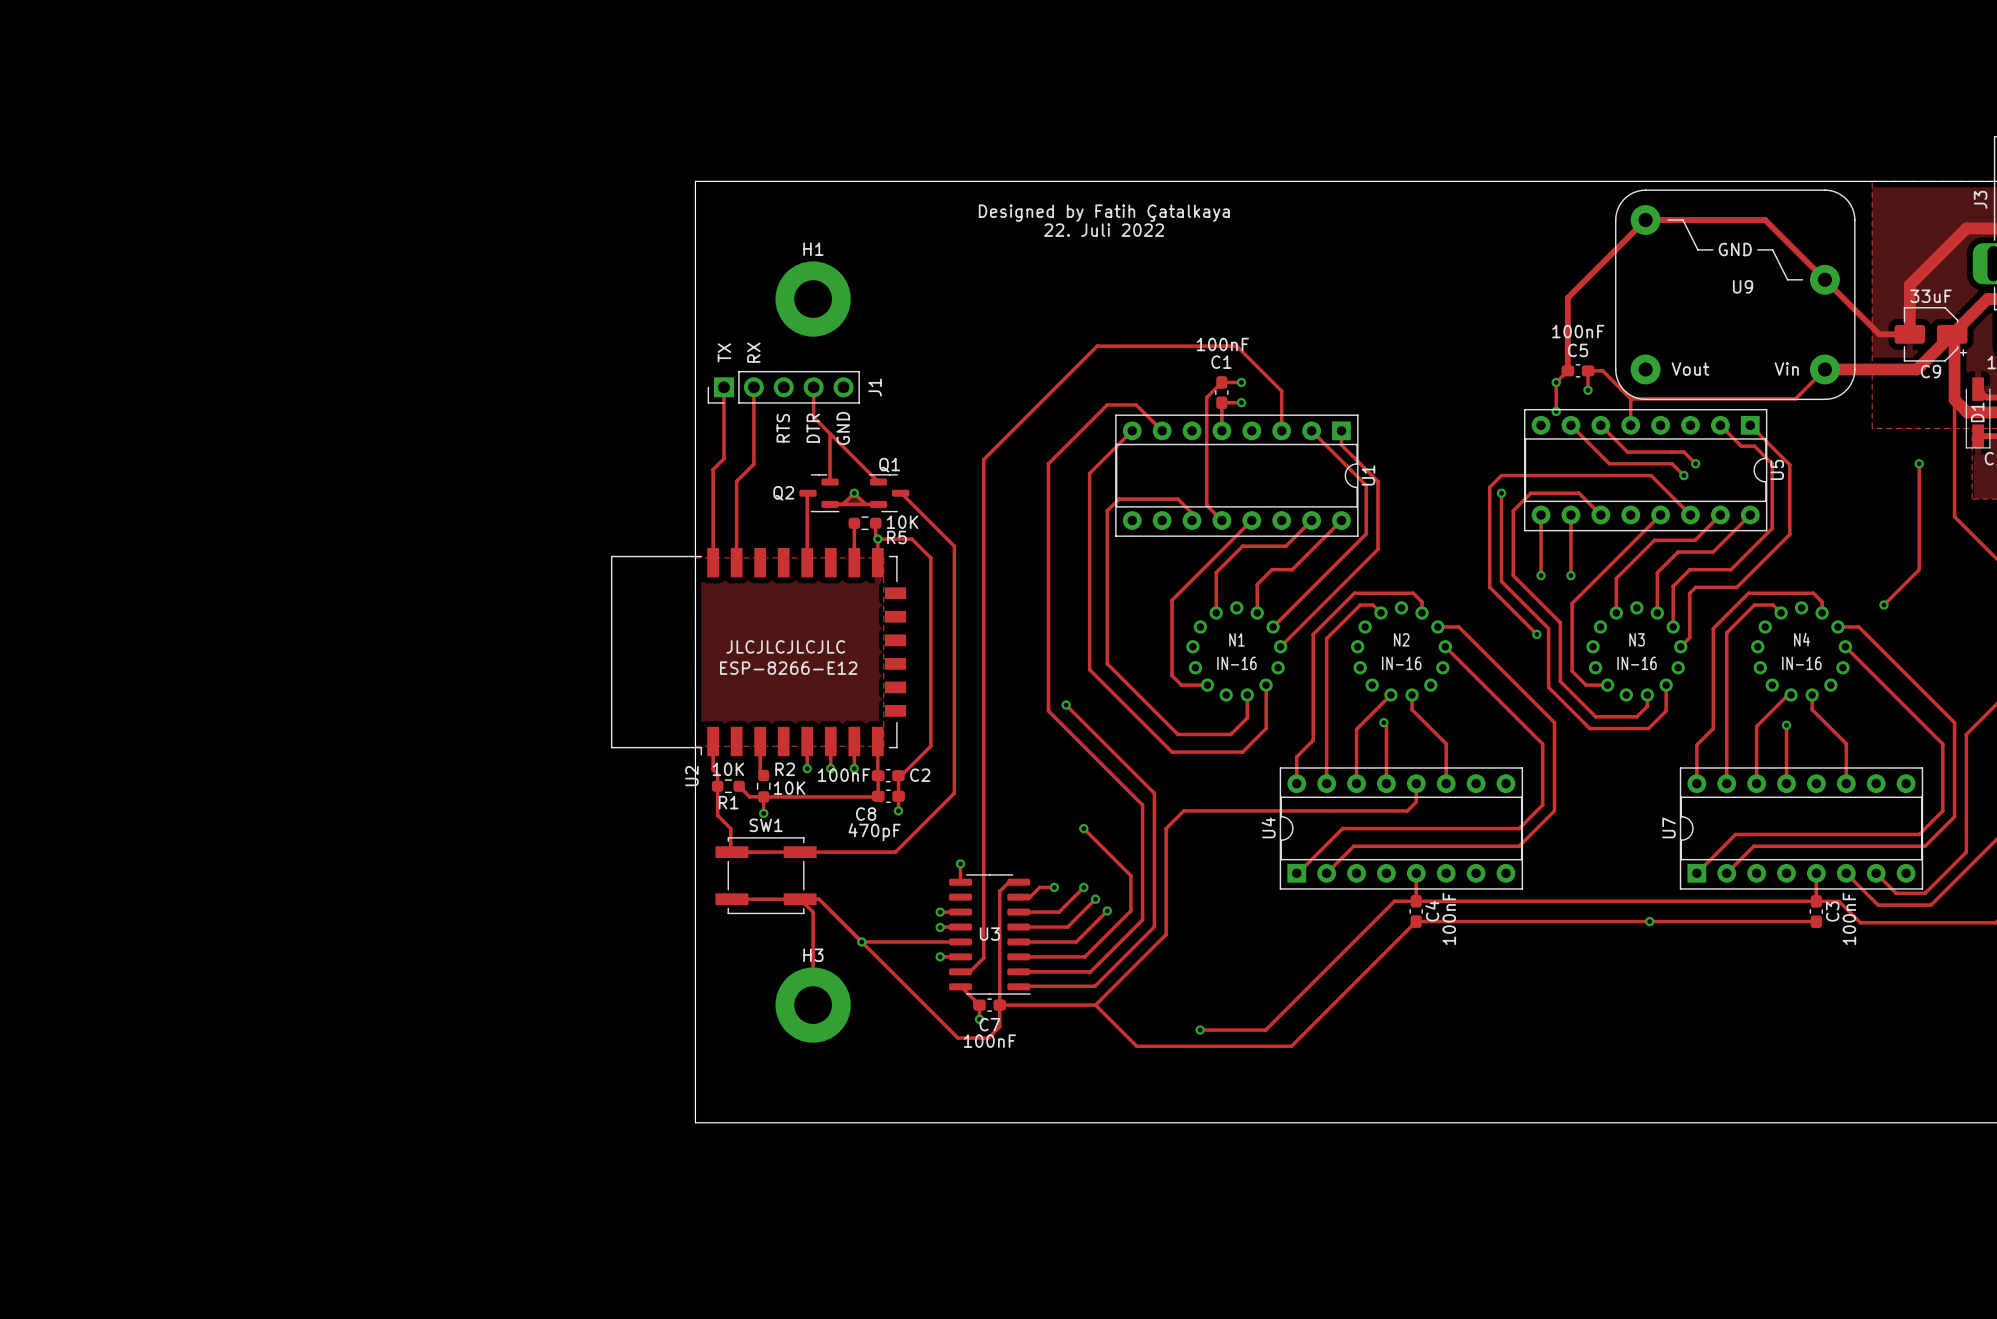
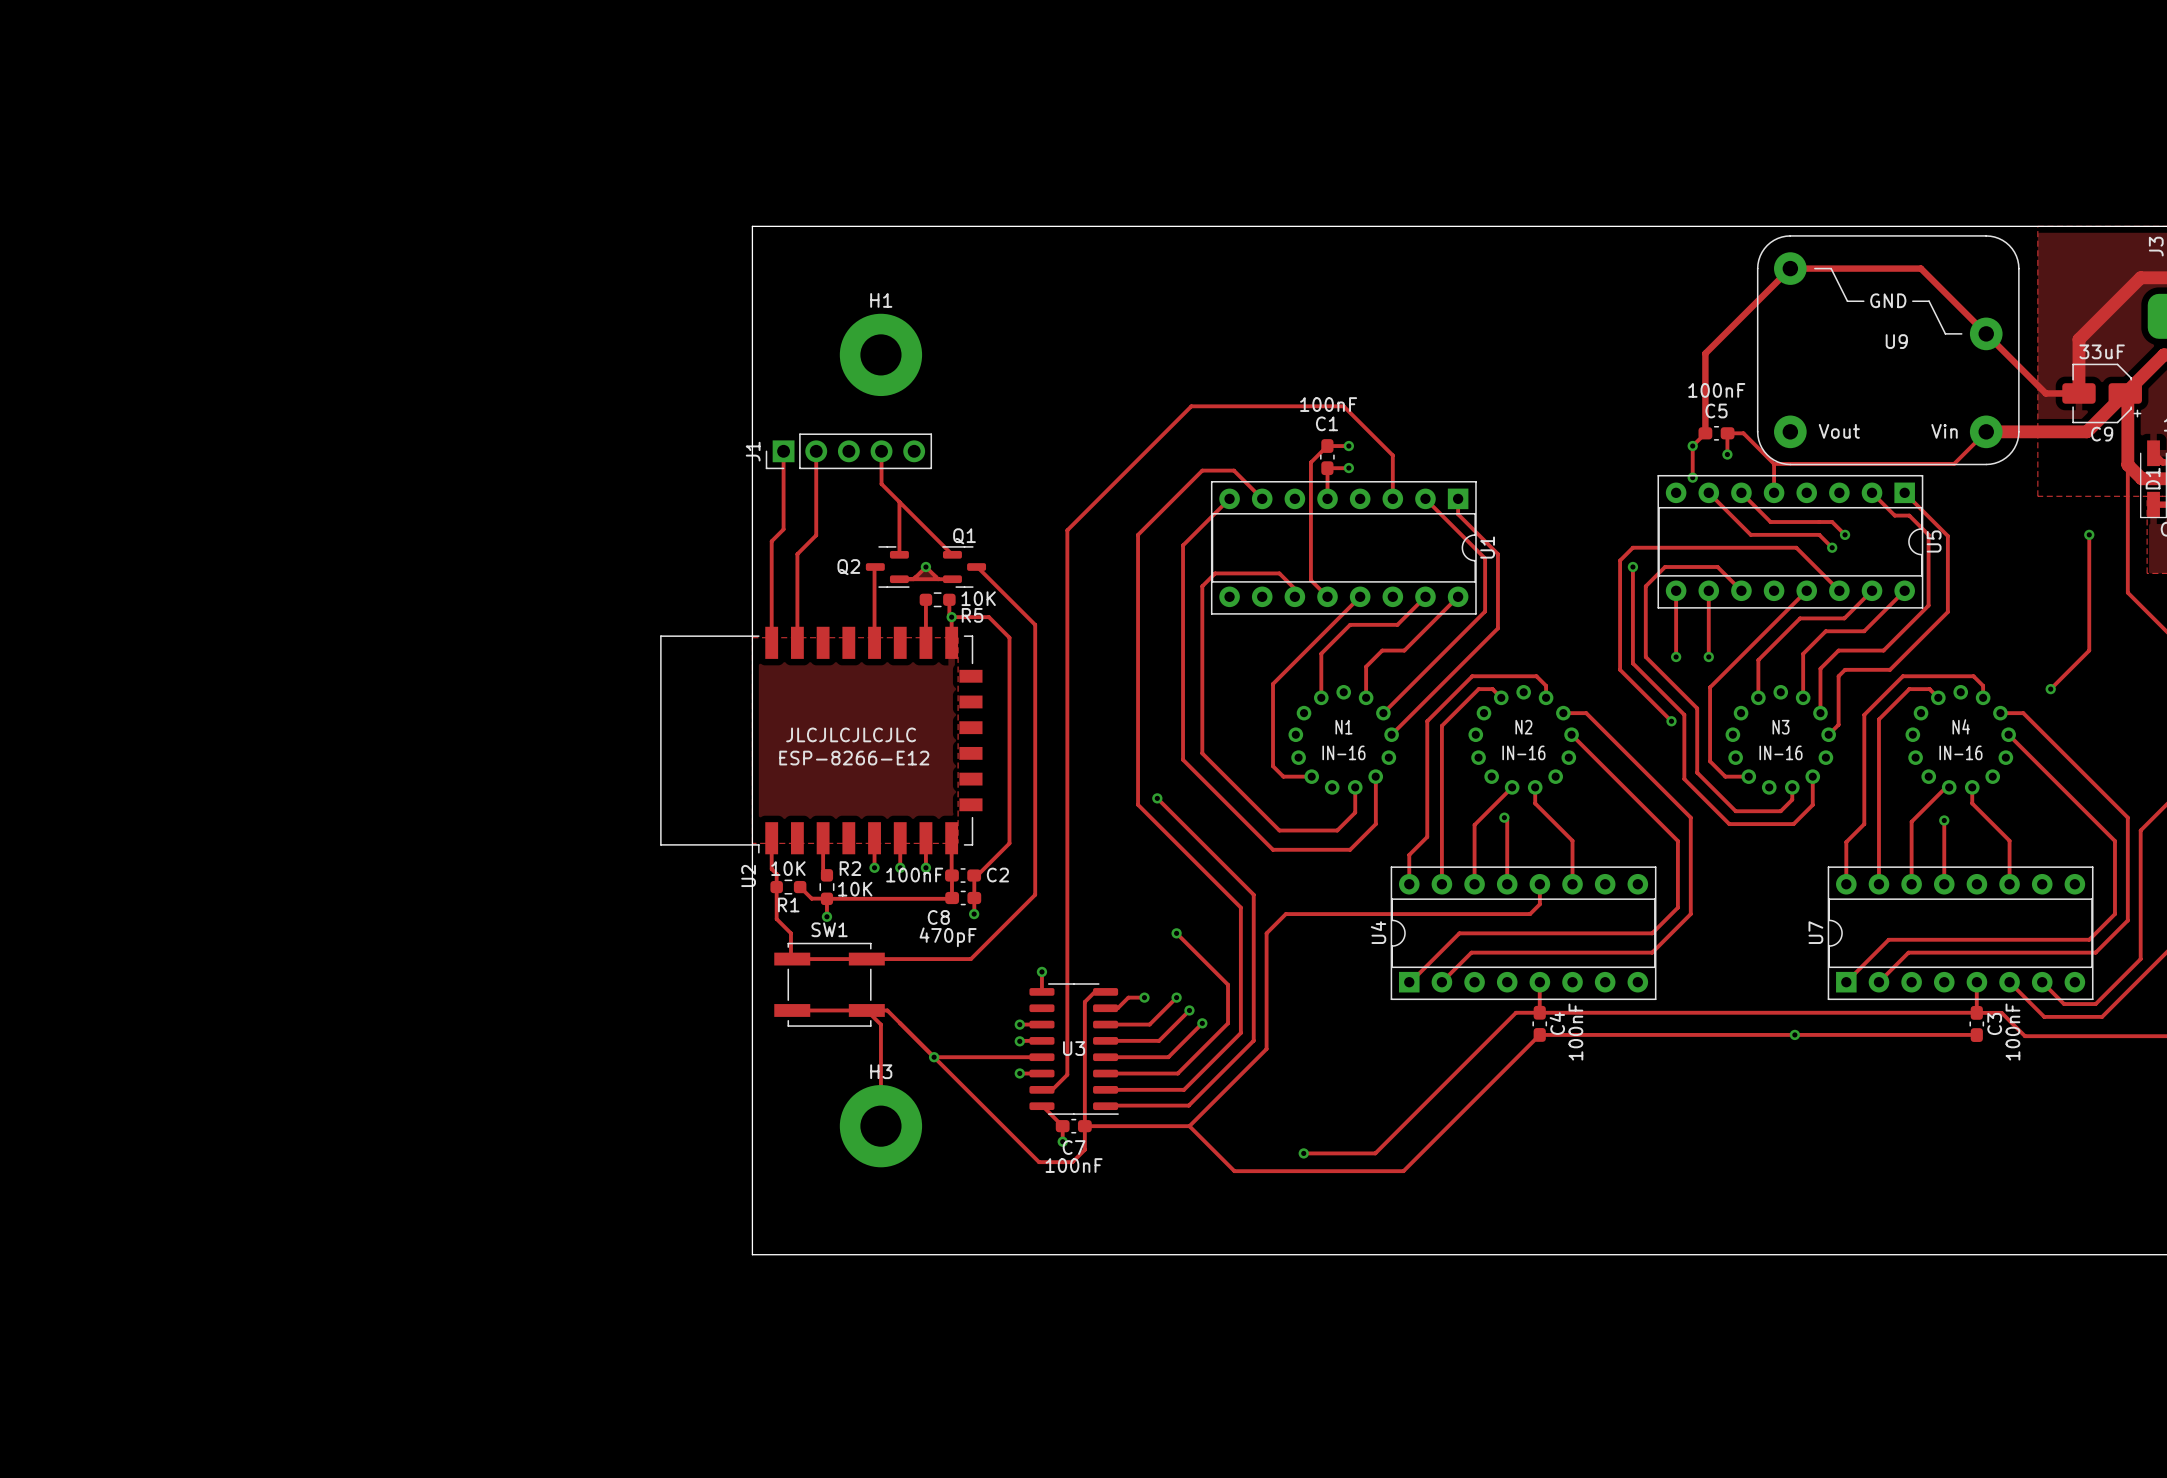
text: Designed by Fatih Çatalkaya (1104, 213) -> none
text: 22. Juli 2022 (1104, 230) -> none
text: TX (724, 352) -> none
text: RX (753, 352) -> none
J1 name position: J1 (875, 387) -> J1 (753, 451)
text: RTS (783, 428) -> none
text: DTR (813, 428) -> none
text: GND (843, 428) -> none

